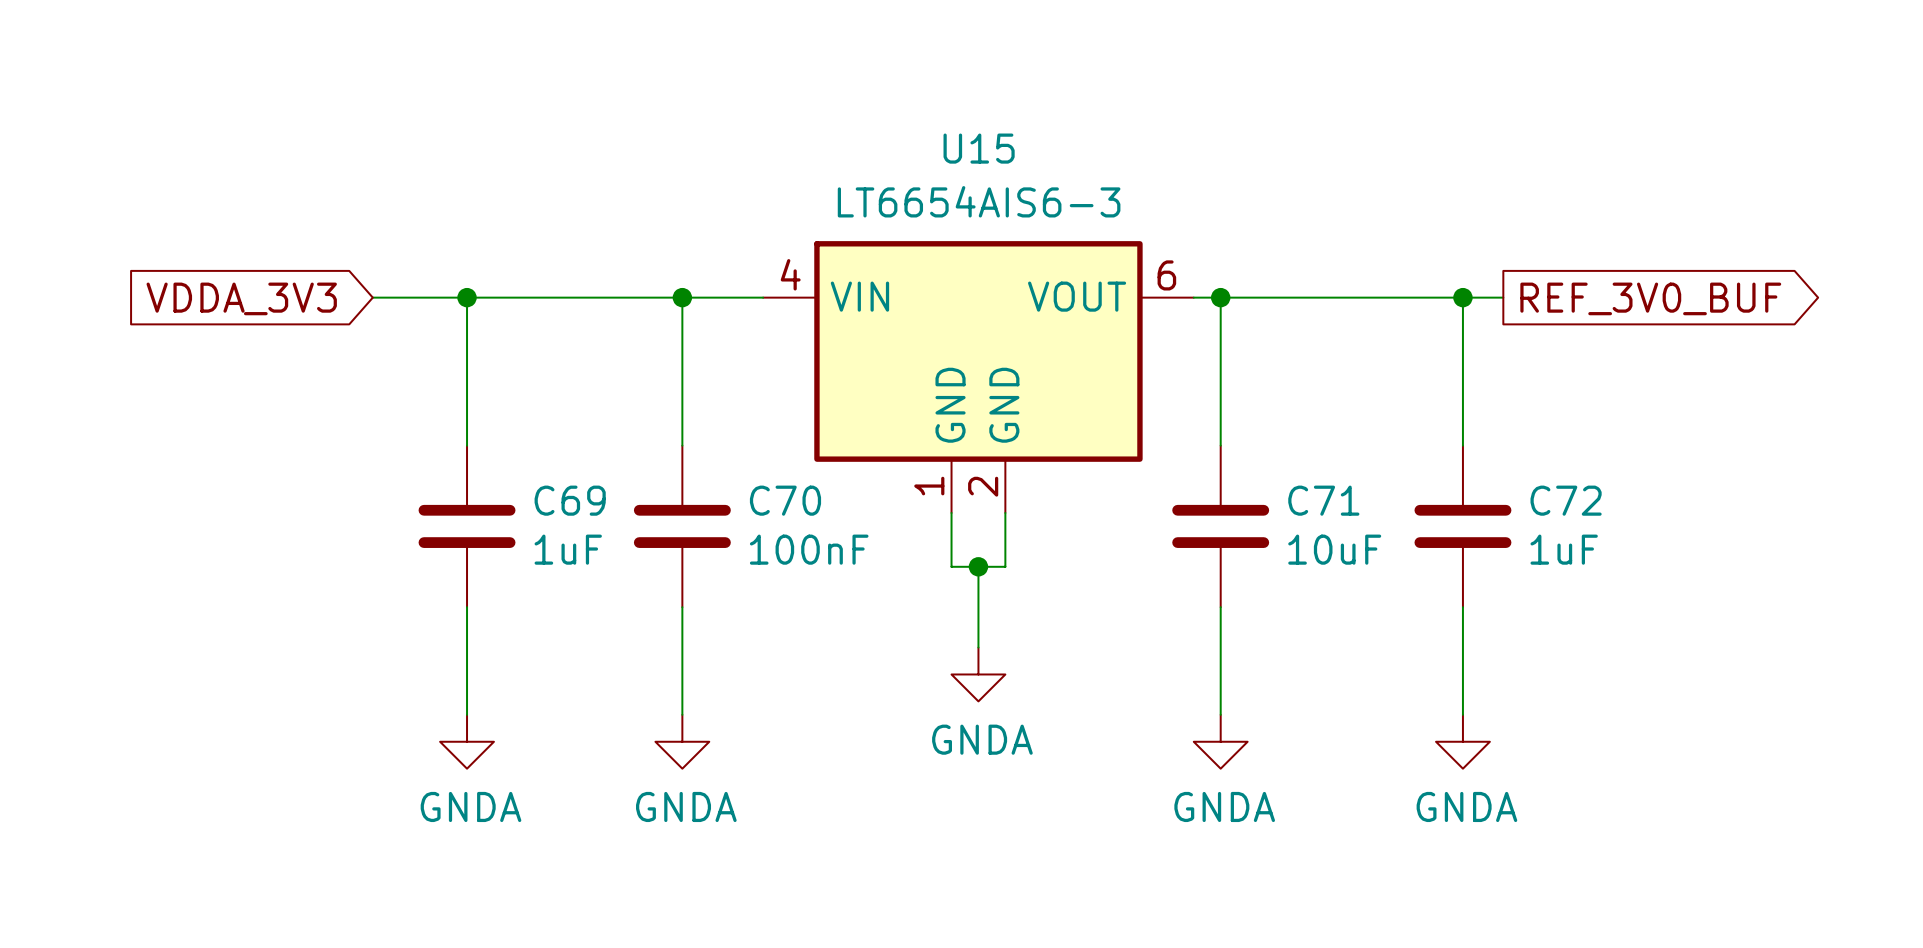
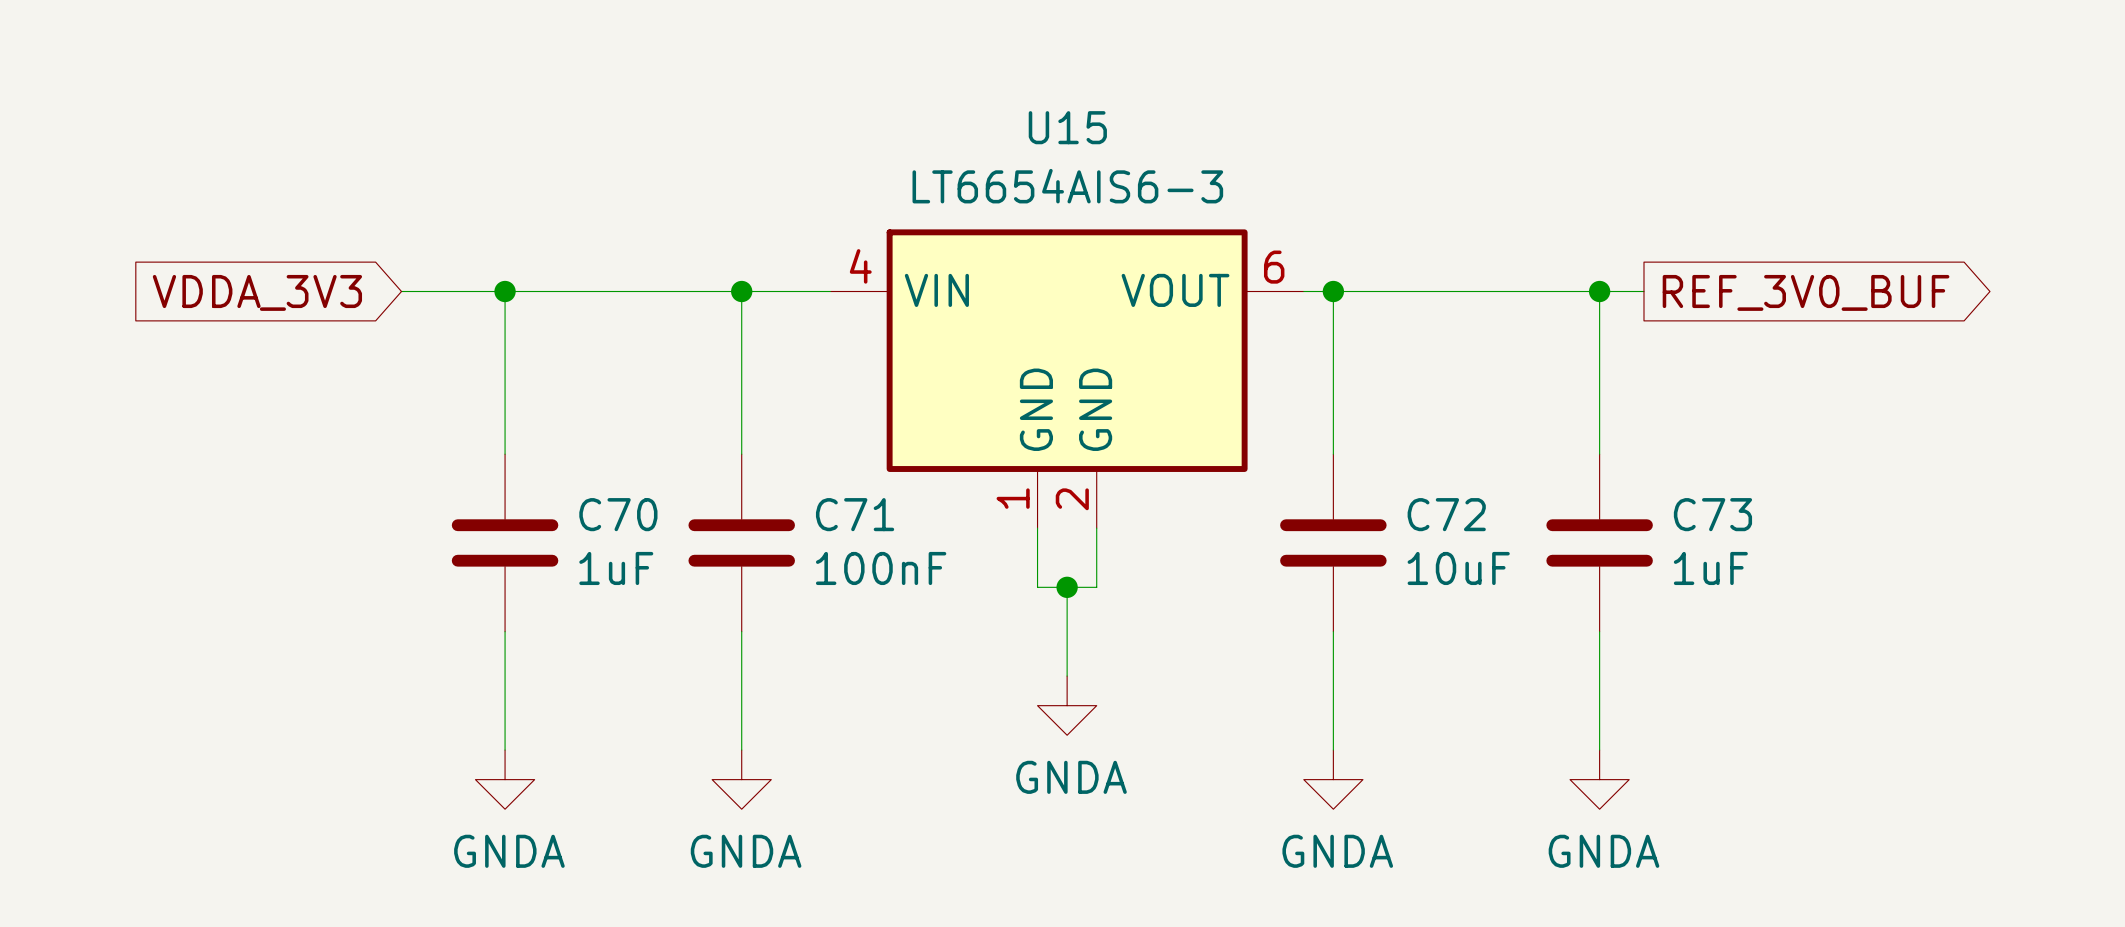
C69 name: C69 (570, 500) -> C70 (618, 514)
C70 name: C70 (785, 500) -> C71 (855, 514)
C71 name: C71 (1323, 500) -> C72 (1446, 514)
C72 name: C72 (1566, 500) -> C73 (1712, 514)

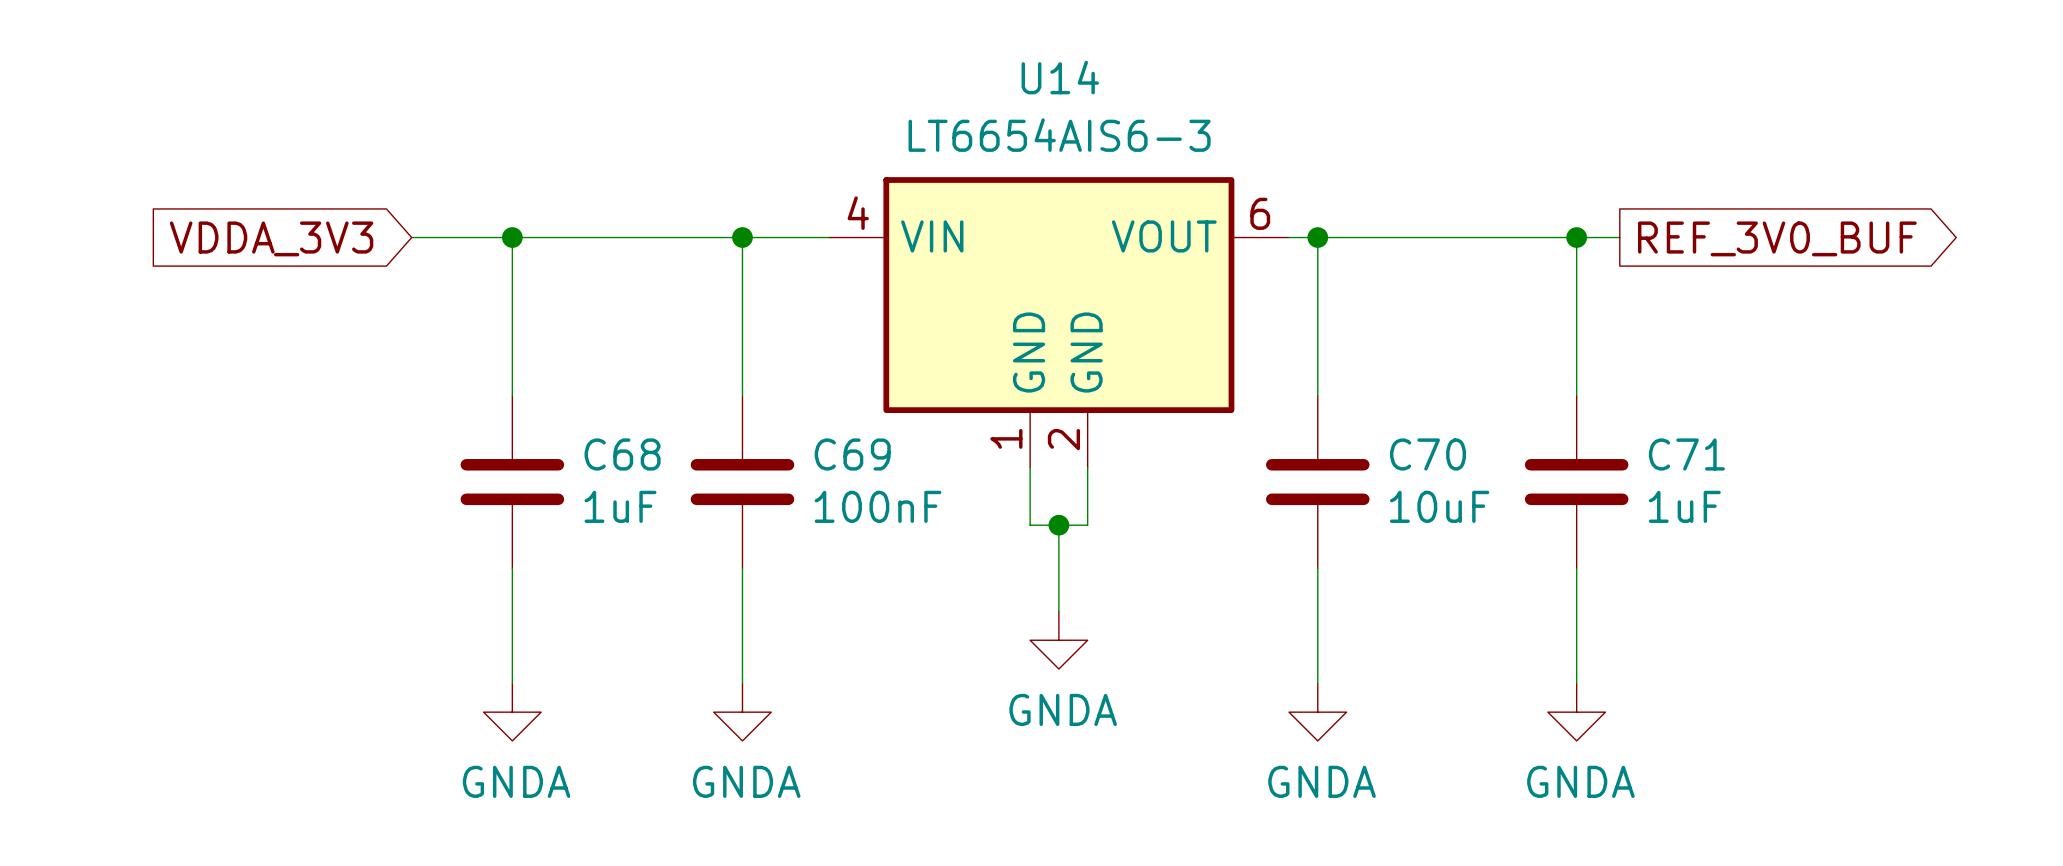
U15 name: U15 (1067, 127) -> U14 (1060, 77)
C70 name: C70 (618, 514) -> C68 (622, 454)
C71 name: C71 (855, 514) -> C69 (852, 454)
C72 name: C72 (1446, 514) -> C70 (1427, 454)
C73 name: C73 (1712, 514) -> C71 (1686, 454)

